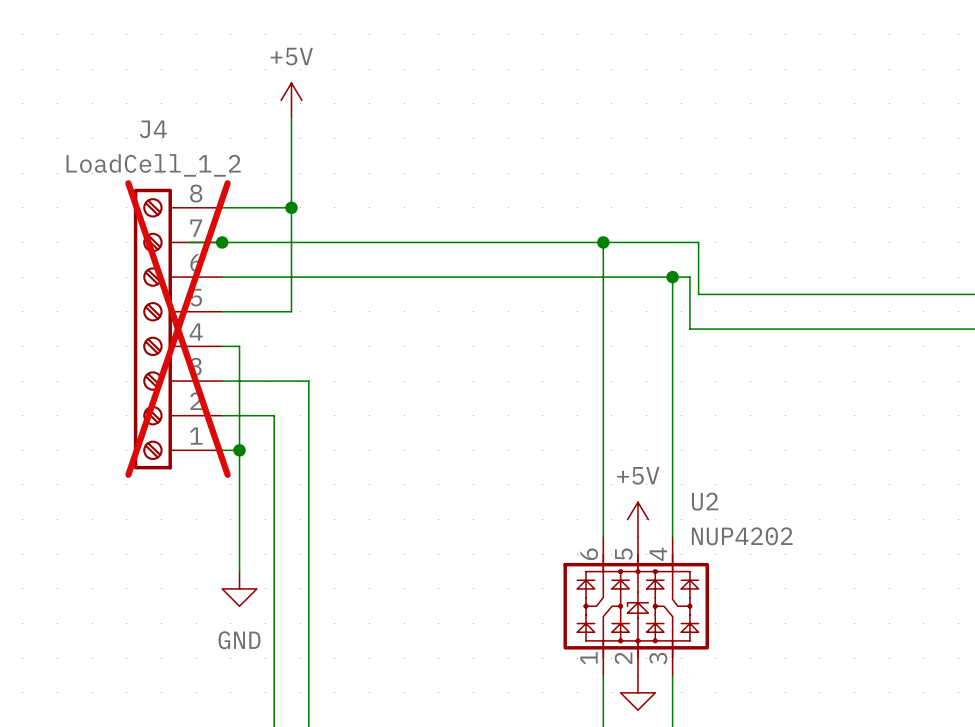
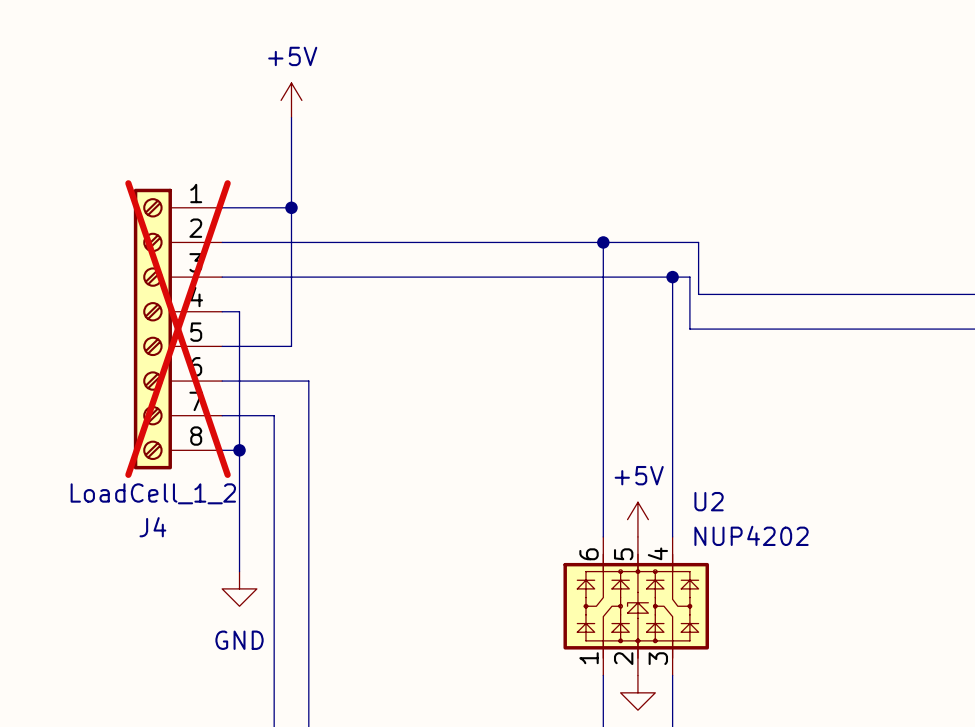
junction: (222, 242) -> none
wire: (239, 311) (291, 311) -> (239, 311) (239, 346) (291, 346) (291, 311)
J4 flip: as is (152, 329) -> up-down (152, 329)

